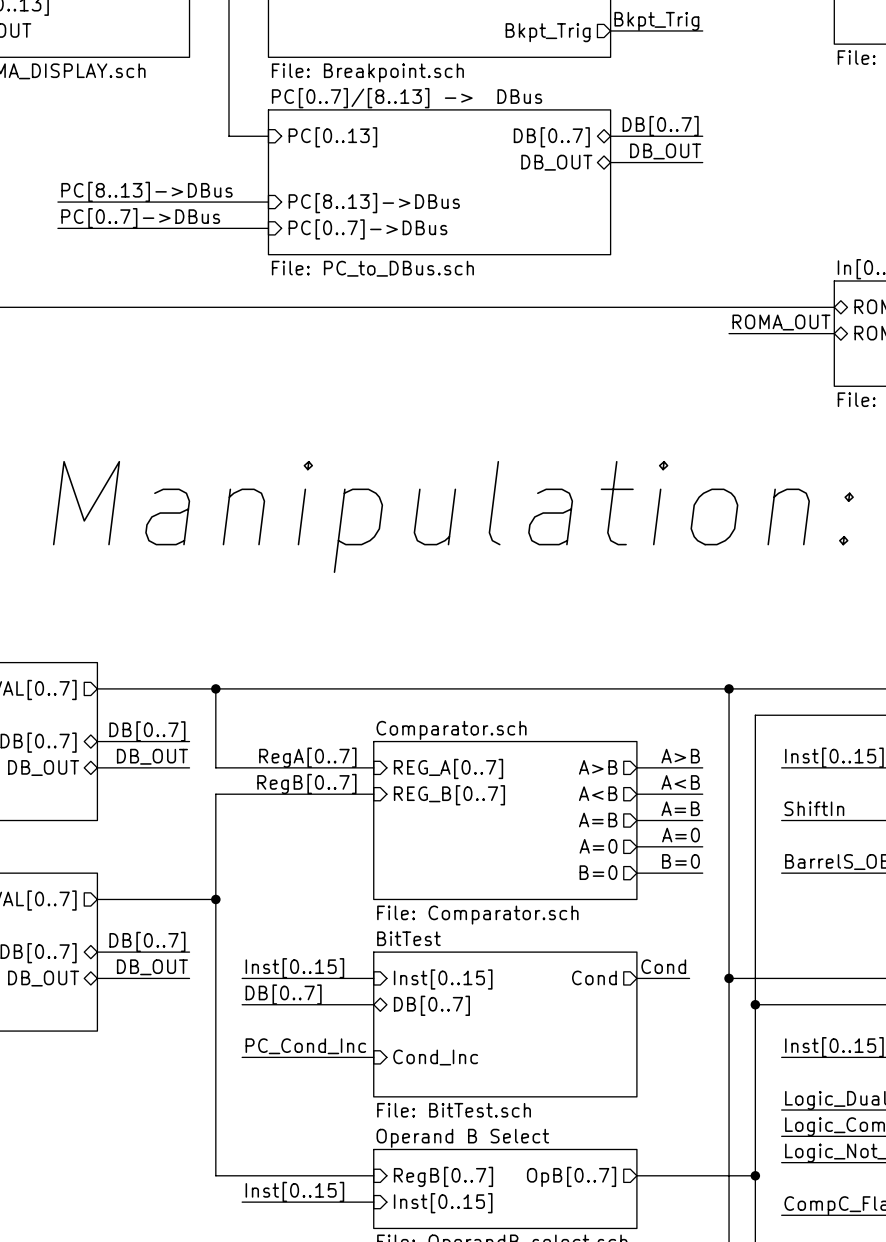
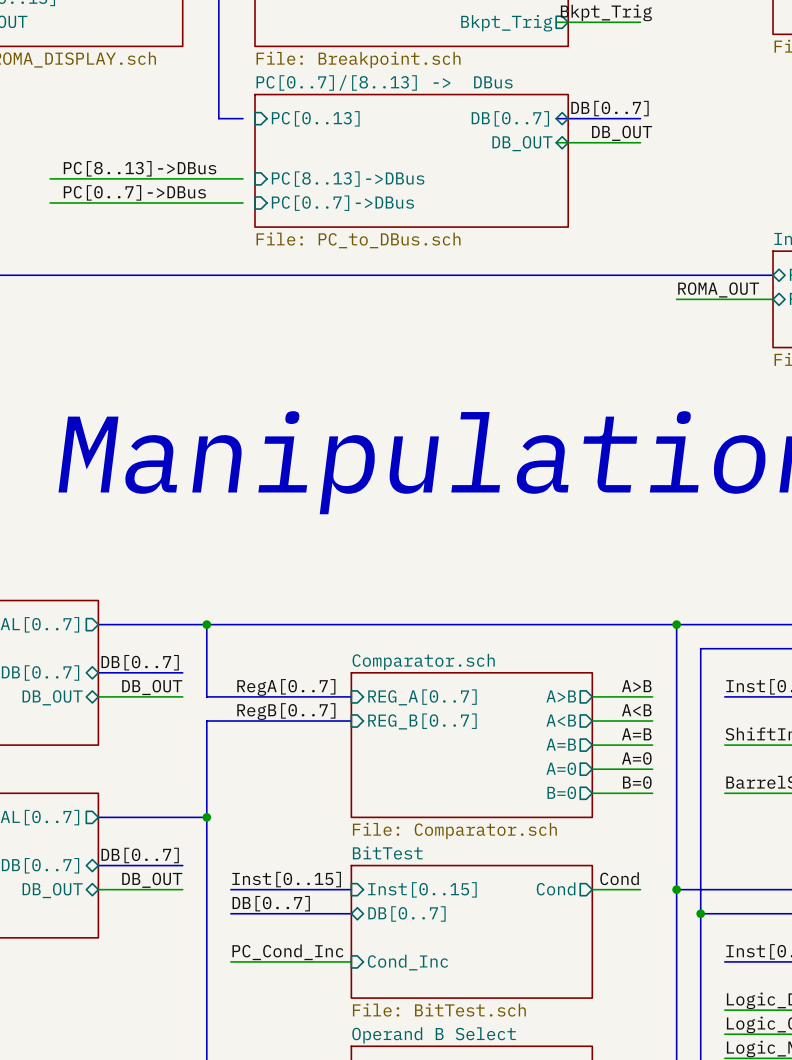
wire: (689, 30) (702, 30) -> (556, 22) (568, 22)
bus: (255, 136) (268, 136) -> none
bus: (689, 136) (702, 136) -> (556, 118) (568, 118)
wire: (689, 162) (702, 162) -> (556, 142) (568, 142)
wire: (255, 202) (268, 202) -> (50, 178) (62, 178)
wire: (255, 228) (268, 228) -> (50, 202) (62, 202)

